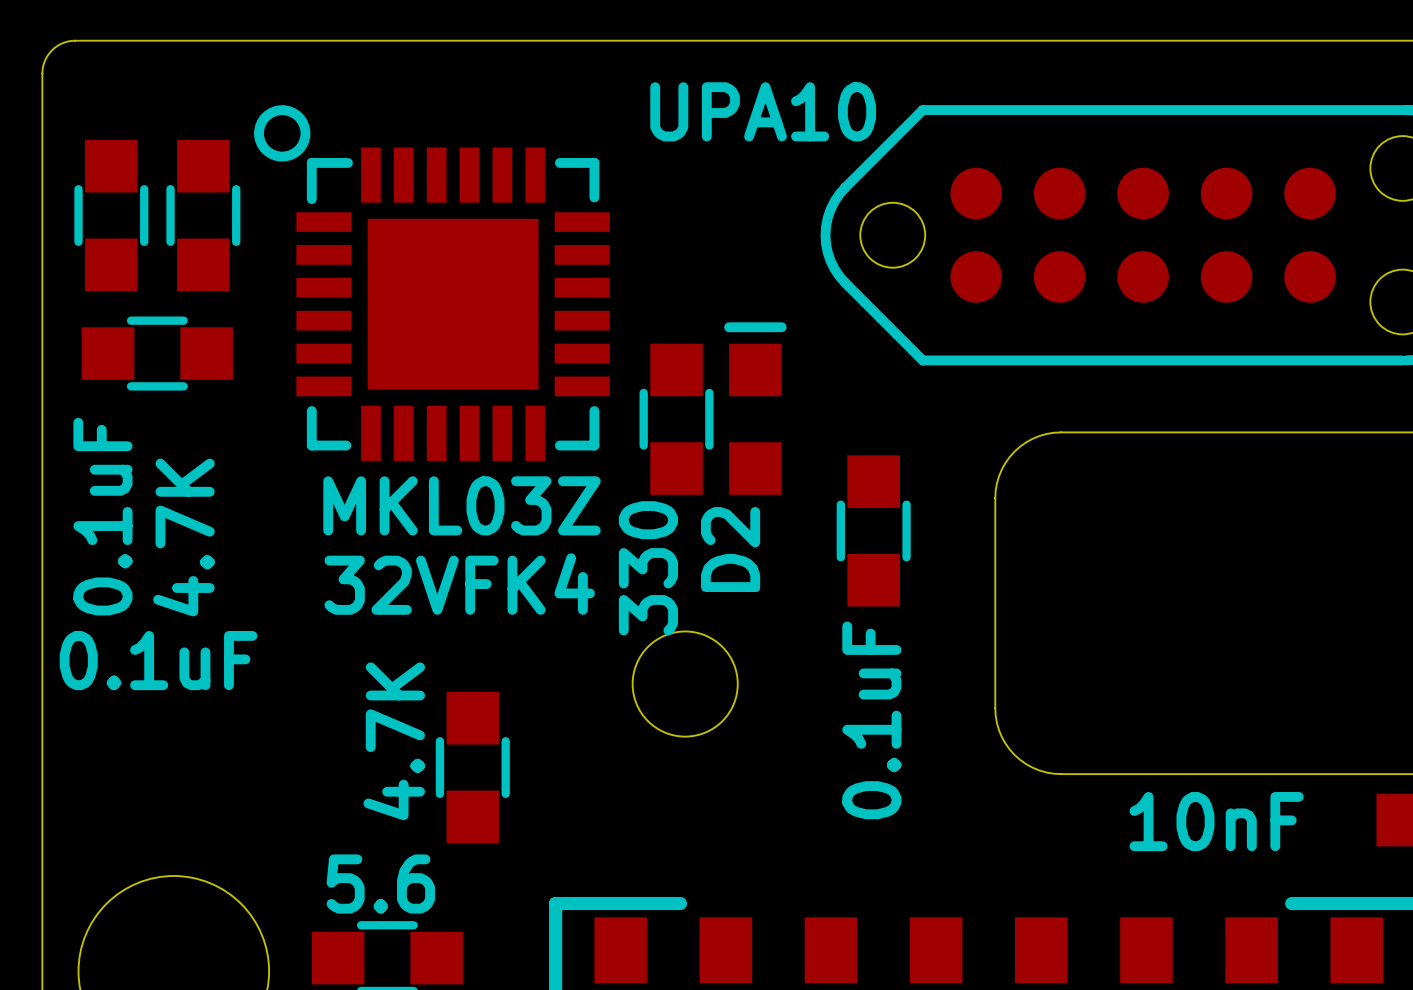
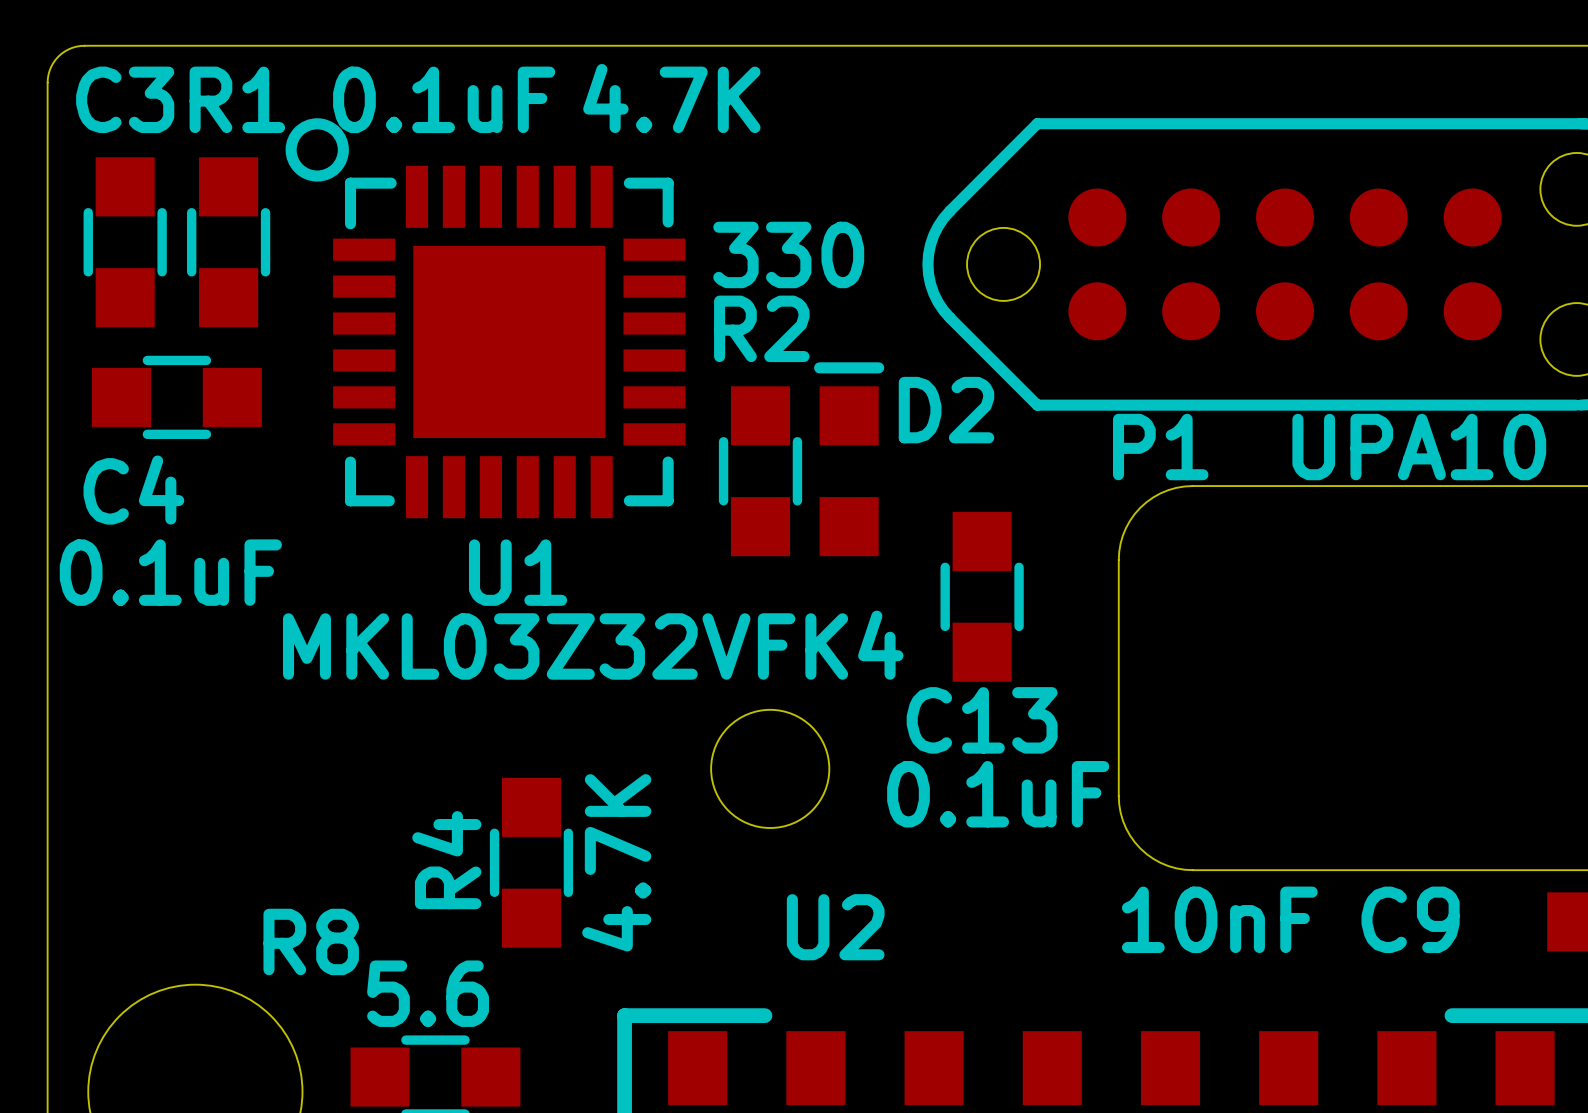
C3 name: none -> C3 (125, 99)
R1 name: none -> R1 (237, 99)
text position: UPA10 (763, 111) -> UPA10 (1419, 447)
R2 name: none -> R2 (761, 328)
P1 name: none -> P1 (1160, 447)
C4 name: none -> C4 (133, 490)
text: MKL03Z (462, 505) -> none
U1 name: none -> U1 (518, 572)
C3 value rotation: 0° (102, 516) -> 90° clockwise (444, 99)
C3 value position: 0.1uF (102, 516) -> 0.1uF (444, 99)
R1 value rotation: 0° (183, 537) -> 90° clockwise (671, 98)
R1 value position: 4.7K (183, 537) -> 4.7K (671, 98)
D2 name rotation: 0° (730, 549) -> 90° clockwise (946, 410)
D2 name position: D2 (730, 549) -> D2 (946, 410)
R2 value rotation: 0° (648, 568) -> 90° clockwise (788, 254)
R2 value position: 330 (648, 568) -> 330 (788, 254)
U1 value: none -> MKL03Z32VFK4 (593, 645)
text: 32VFK4 (459, 584) -> none
C13 name: none -> C13 (982, 720)
C4 value position: 0.1uF (158, 660) -> 0.1uF (170, 572)
C13 value rotation: 0° (871, 720) -> 90° clockwise (998, 794)
R4 value position: 4.7K (394, 741) -> 4.7K (616, 862)
R4 name: none -> R4 (446, 860)
C9 name: none -> C9 (1410, 919)
C9 value position: 10nF (1216, 821) -> 10nF (1219, 919)
U2 name: none -> U2 (835, 927)
R8 name: none -> R8 (311, 941)

